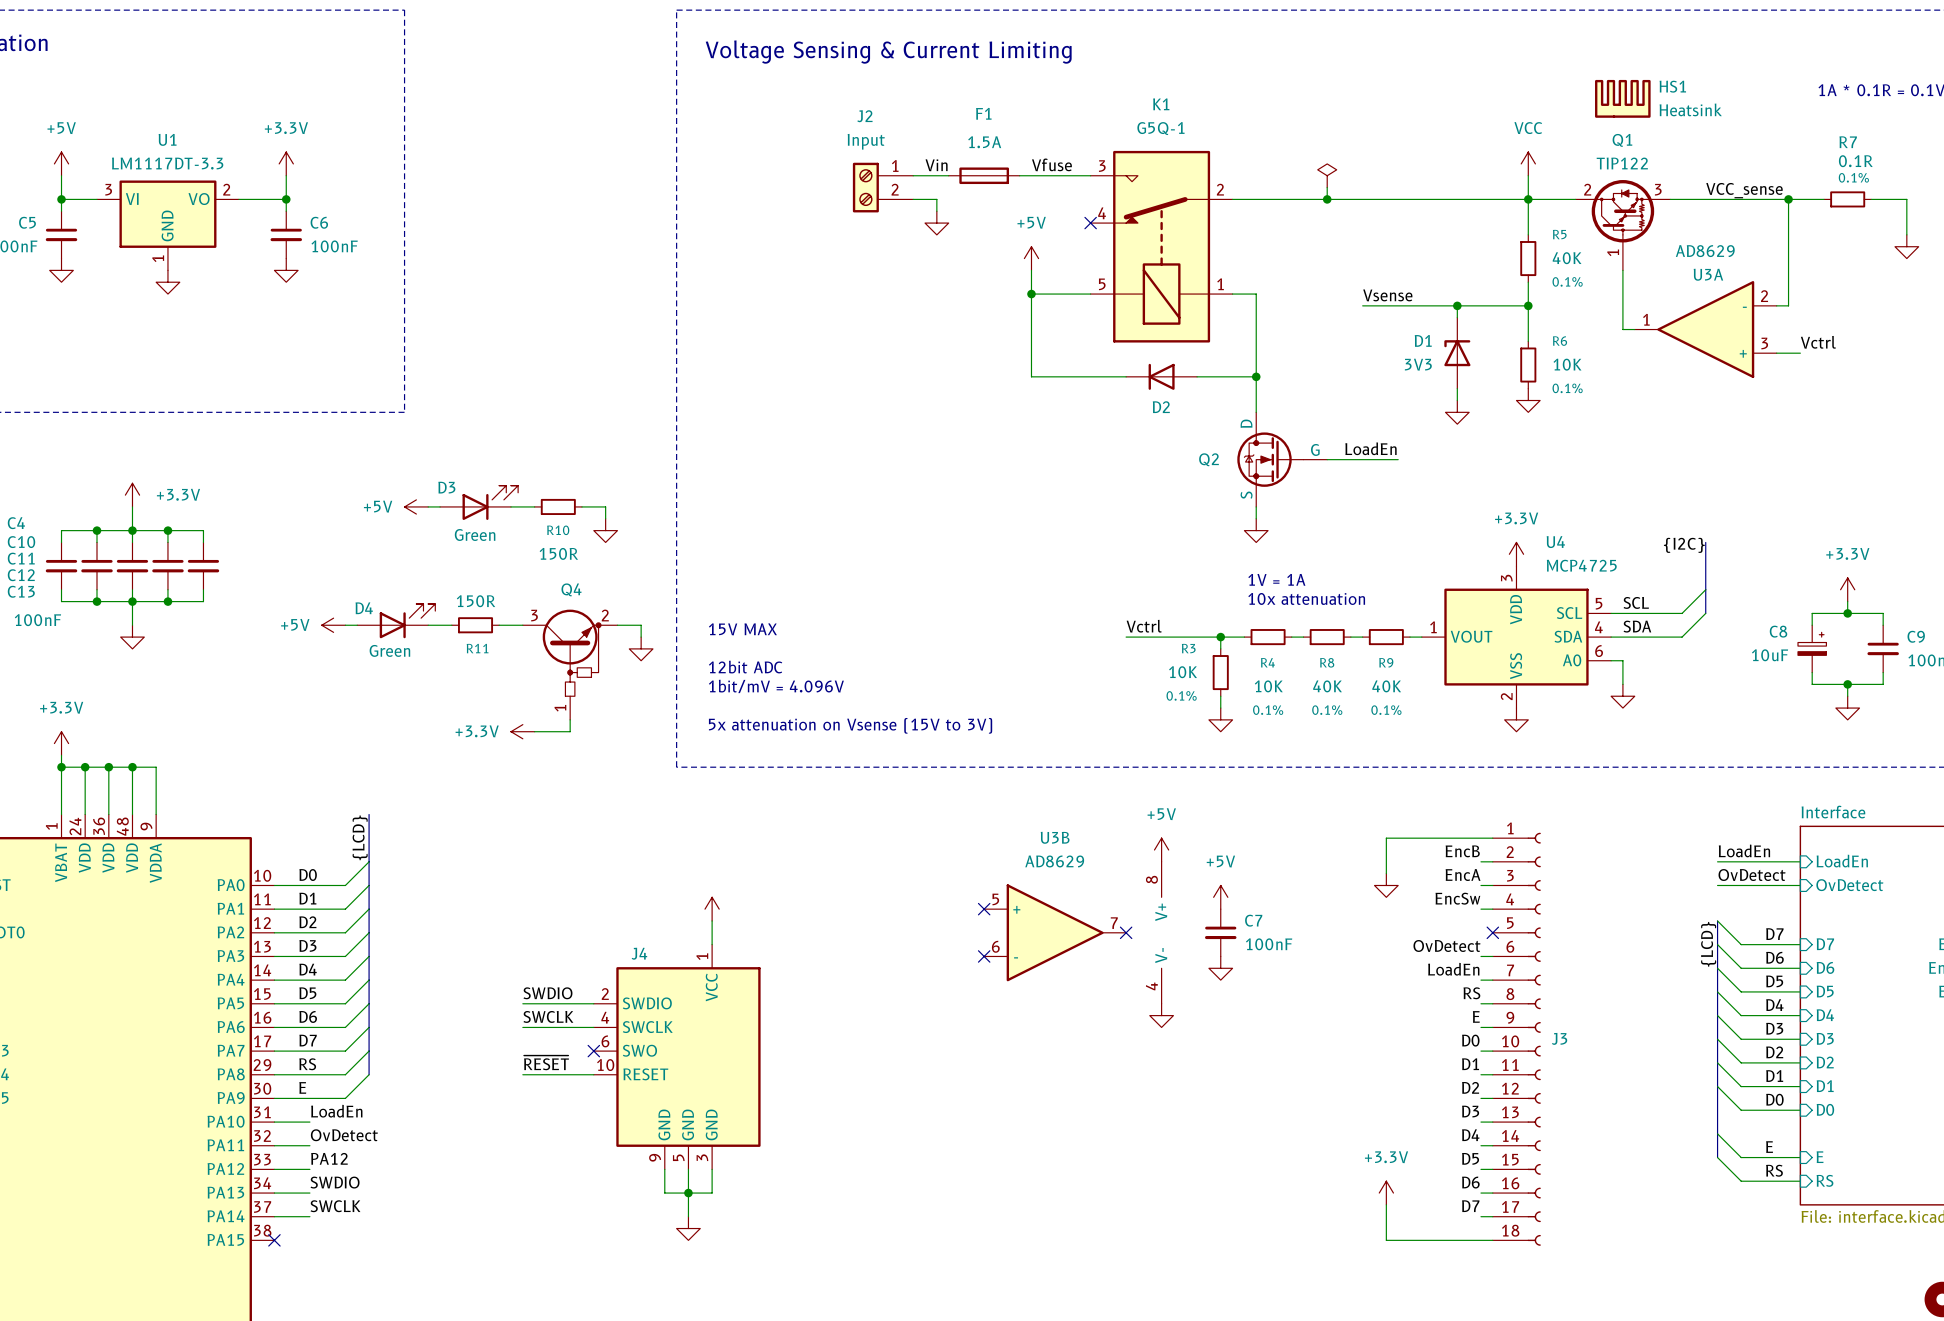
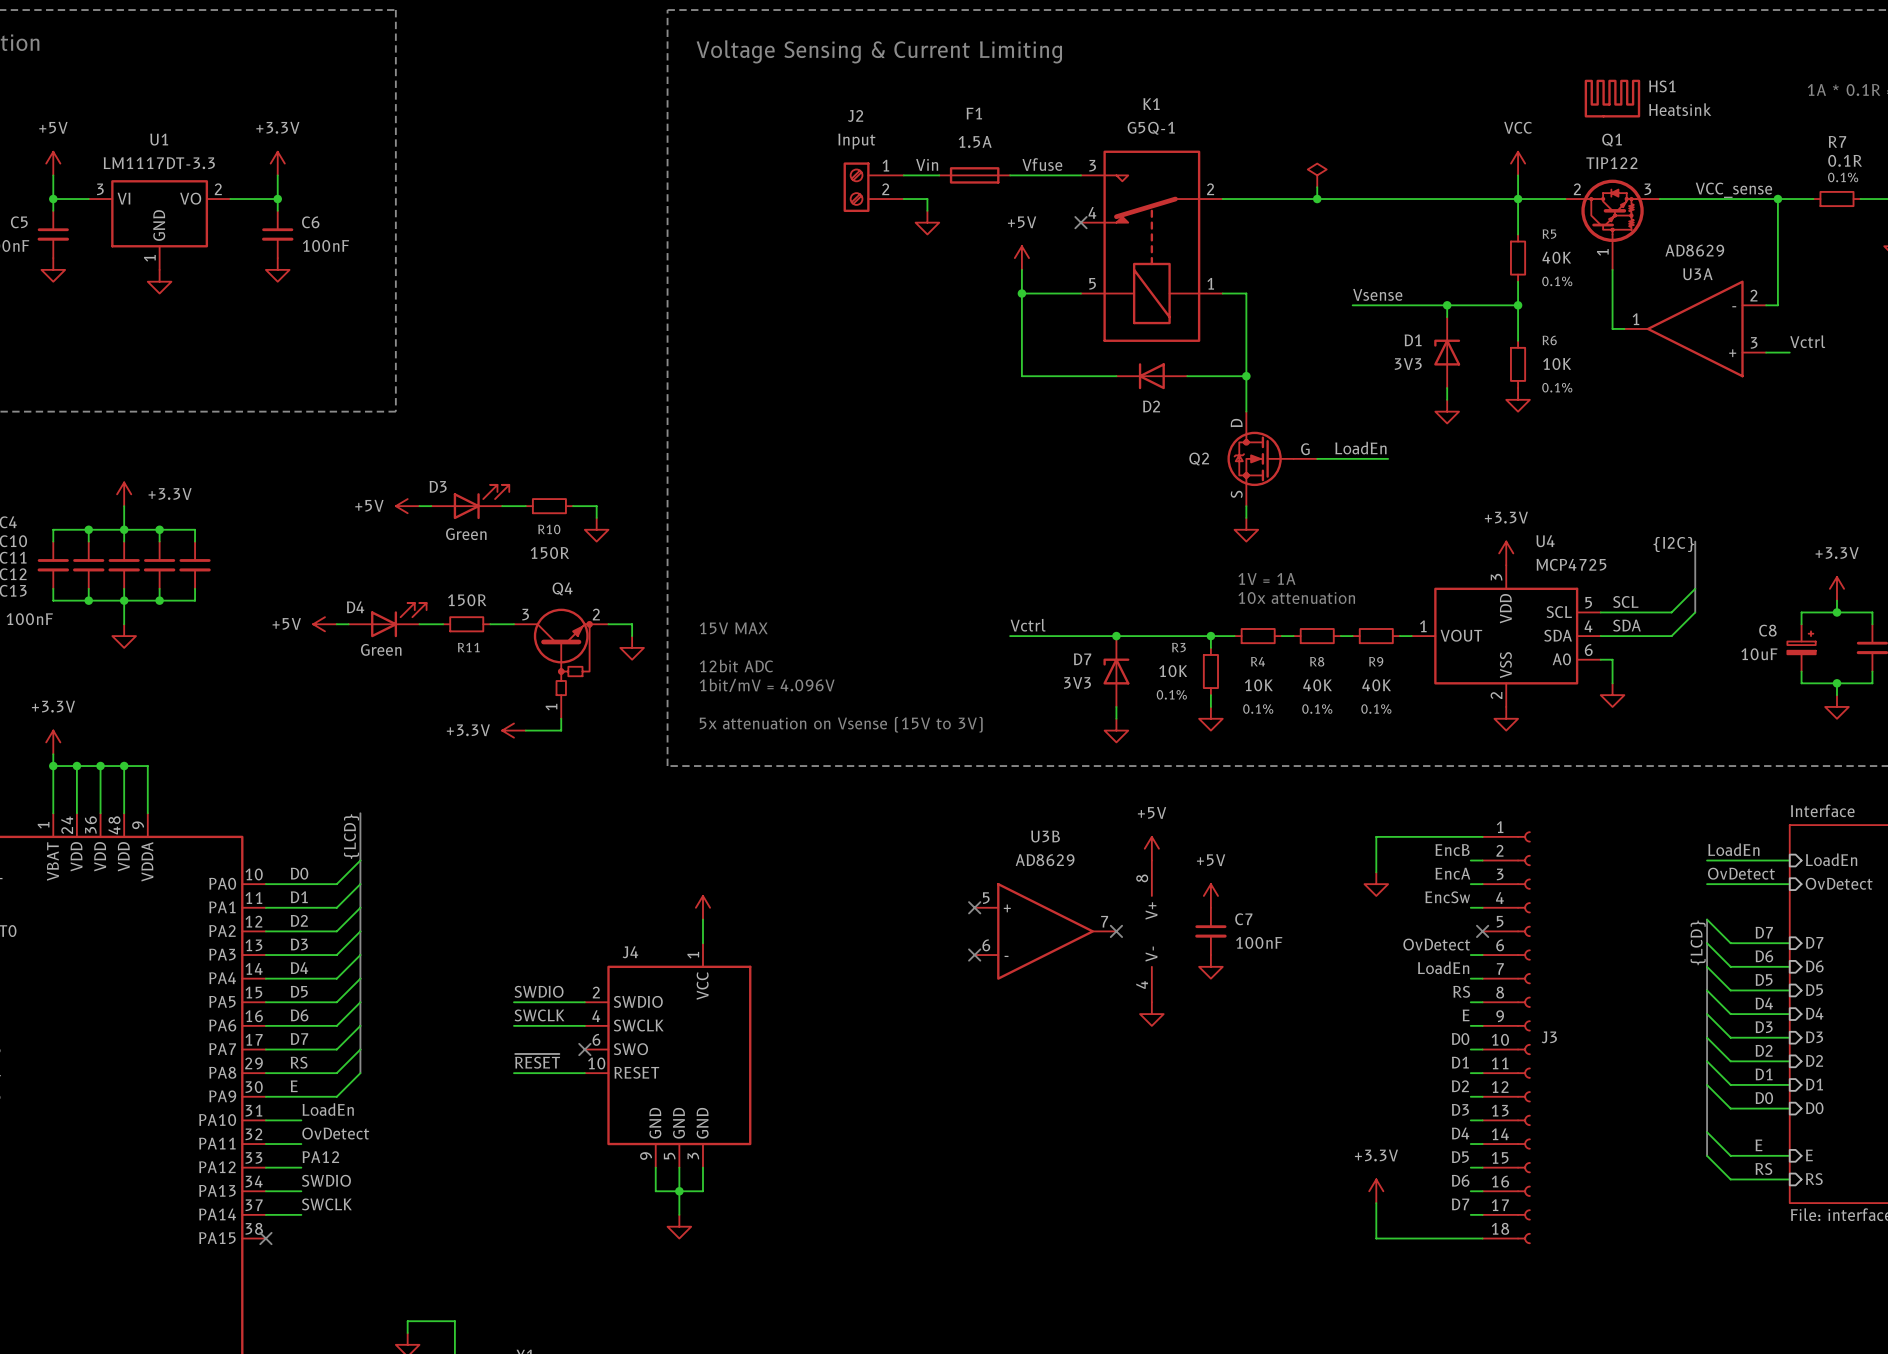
label position: Vctrl (1144, 626) -> Vctrl (1028, 625)
wire: none -> (1010, 636) (1116, 636)
junction: none -> (1116, 636)
D7: none -> (1116, 671)
wire: none -> (1116, 706) (1116, 718)
power symbol: none -> (1116, 730)

